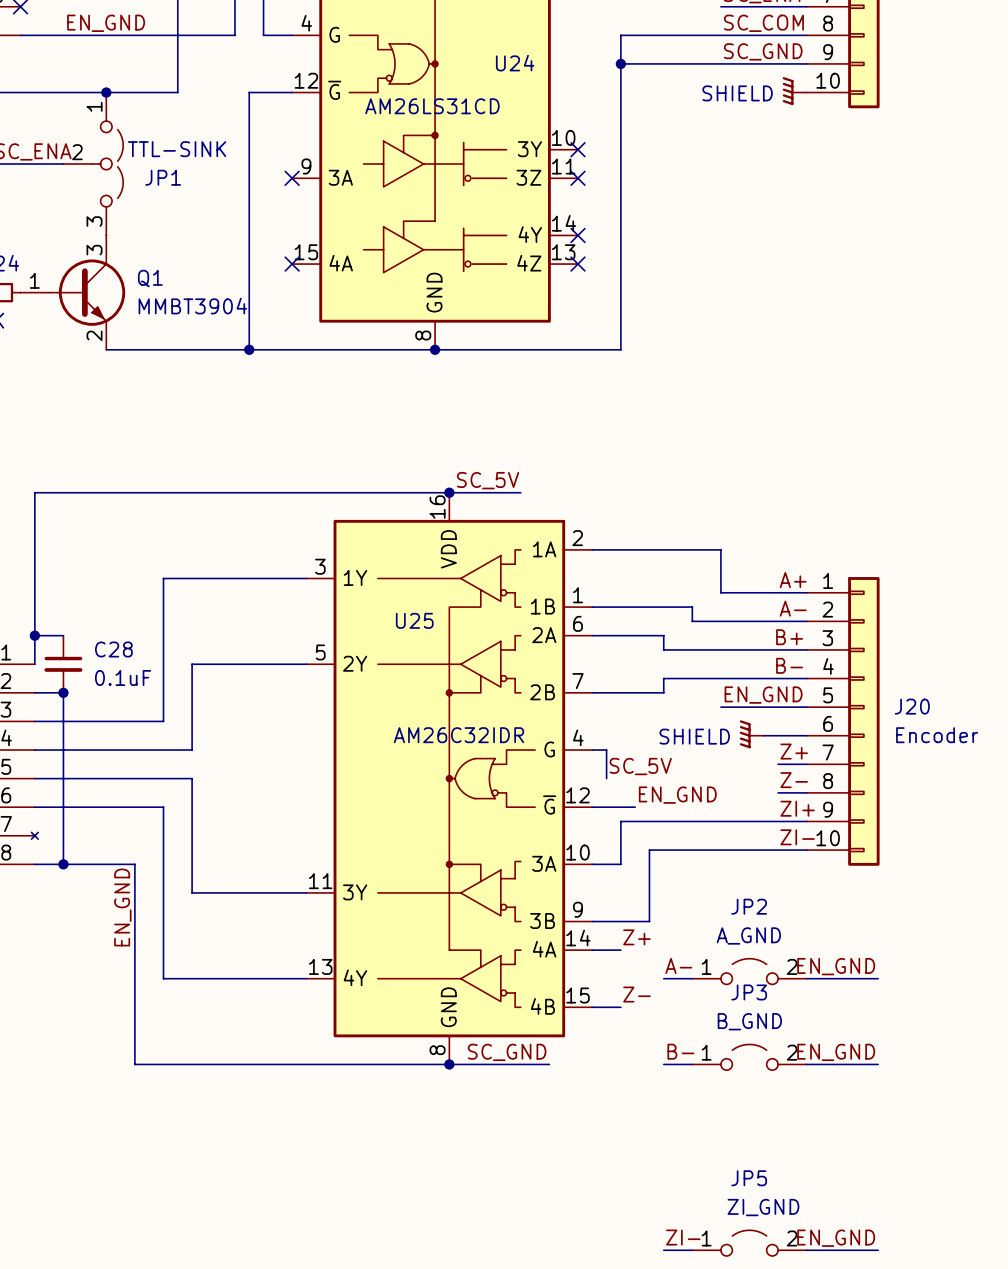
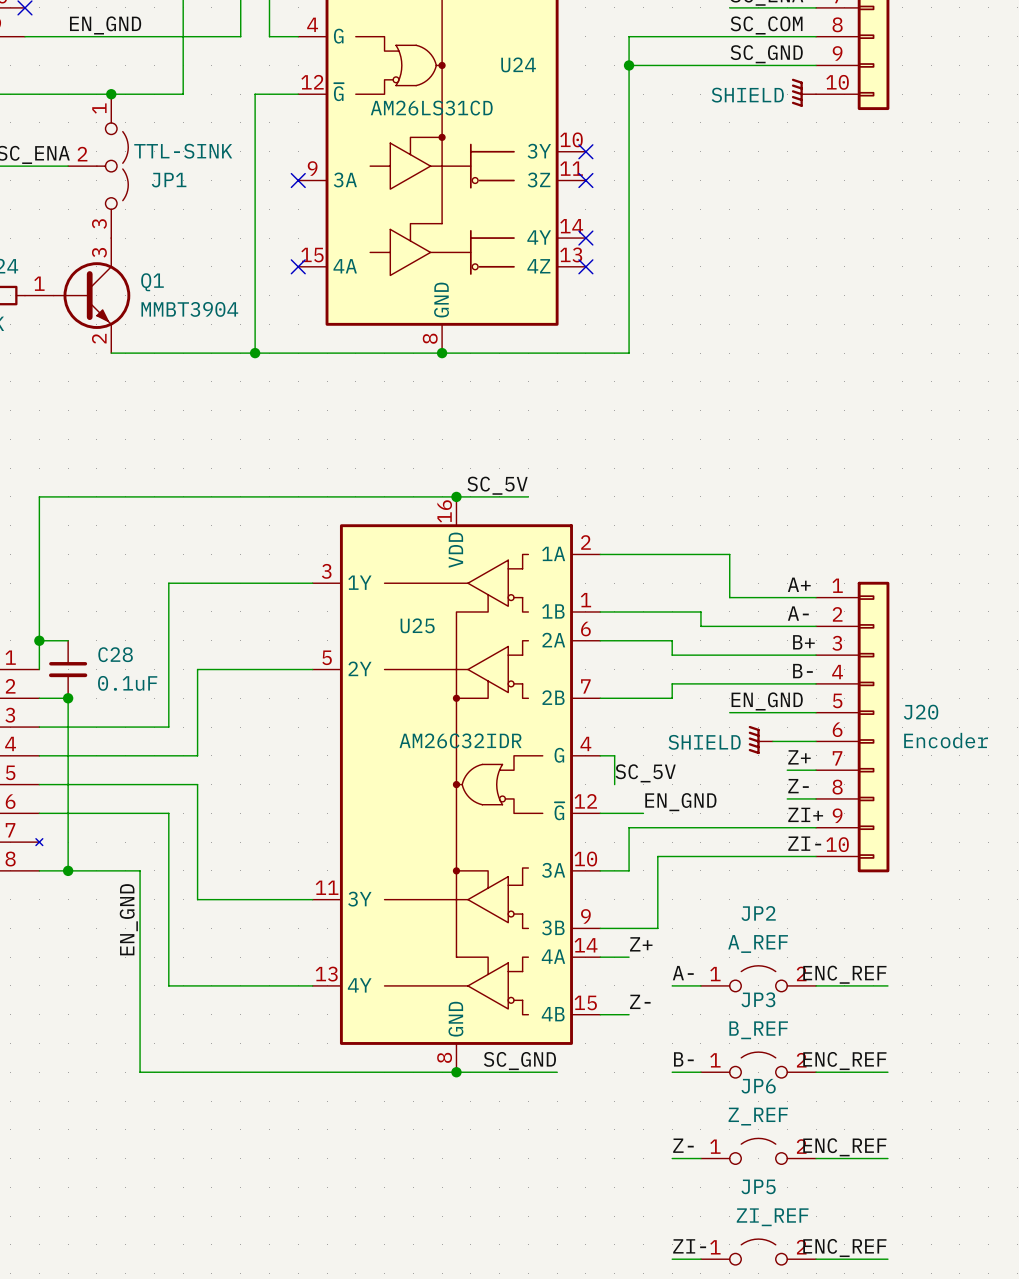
JP2 value: A_GND (748, 935) -> A_REF (758, 943)
label: EN_GND (836, 966) -> ENC_REF (844, 974)
JP3 value: B_GND (749, 1021) -> B_REF (758, 1030)
label: EN_GND (836, 1052) -> ENC_REF (844, 1061)
label: none -> Z- (683, 1145)
label: none -> ENC_REF (844, 1147)
JP6: none -> Z_REF (758, 1151)
wire: none -> (672, 1158) (700, 1158)
wire: none -> (816, 1158) (887, 1158)
JP5 value: ZI_GND (763, 1207) -> ZI_REF (772, 1217)
label: EN_GND (836, 1238) -> ENC_REF (844, 1247)

